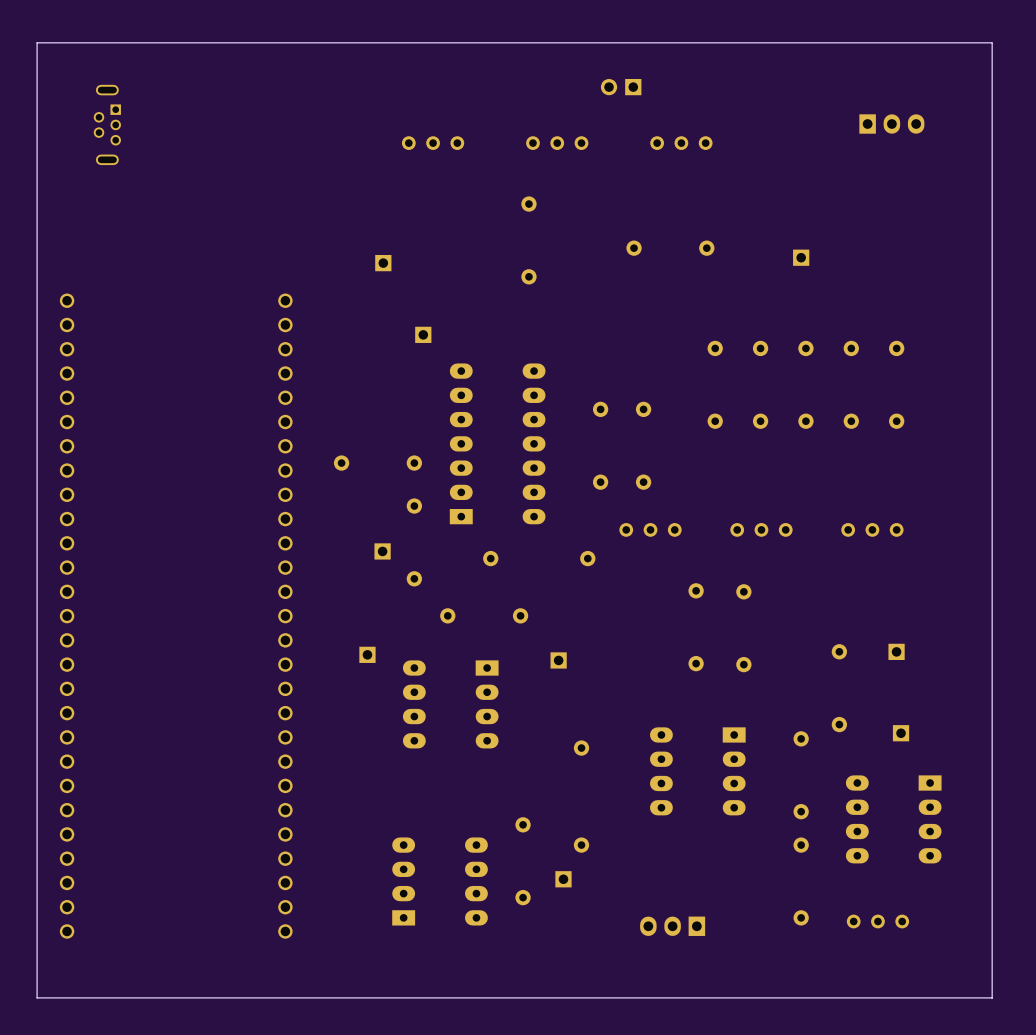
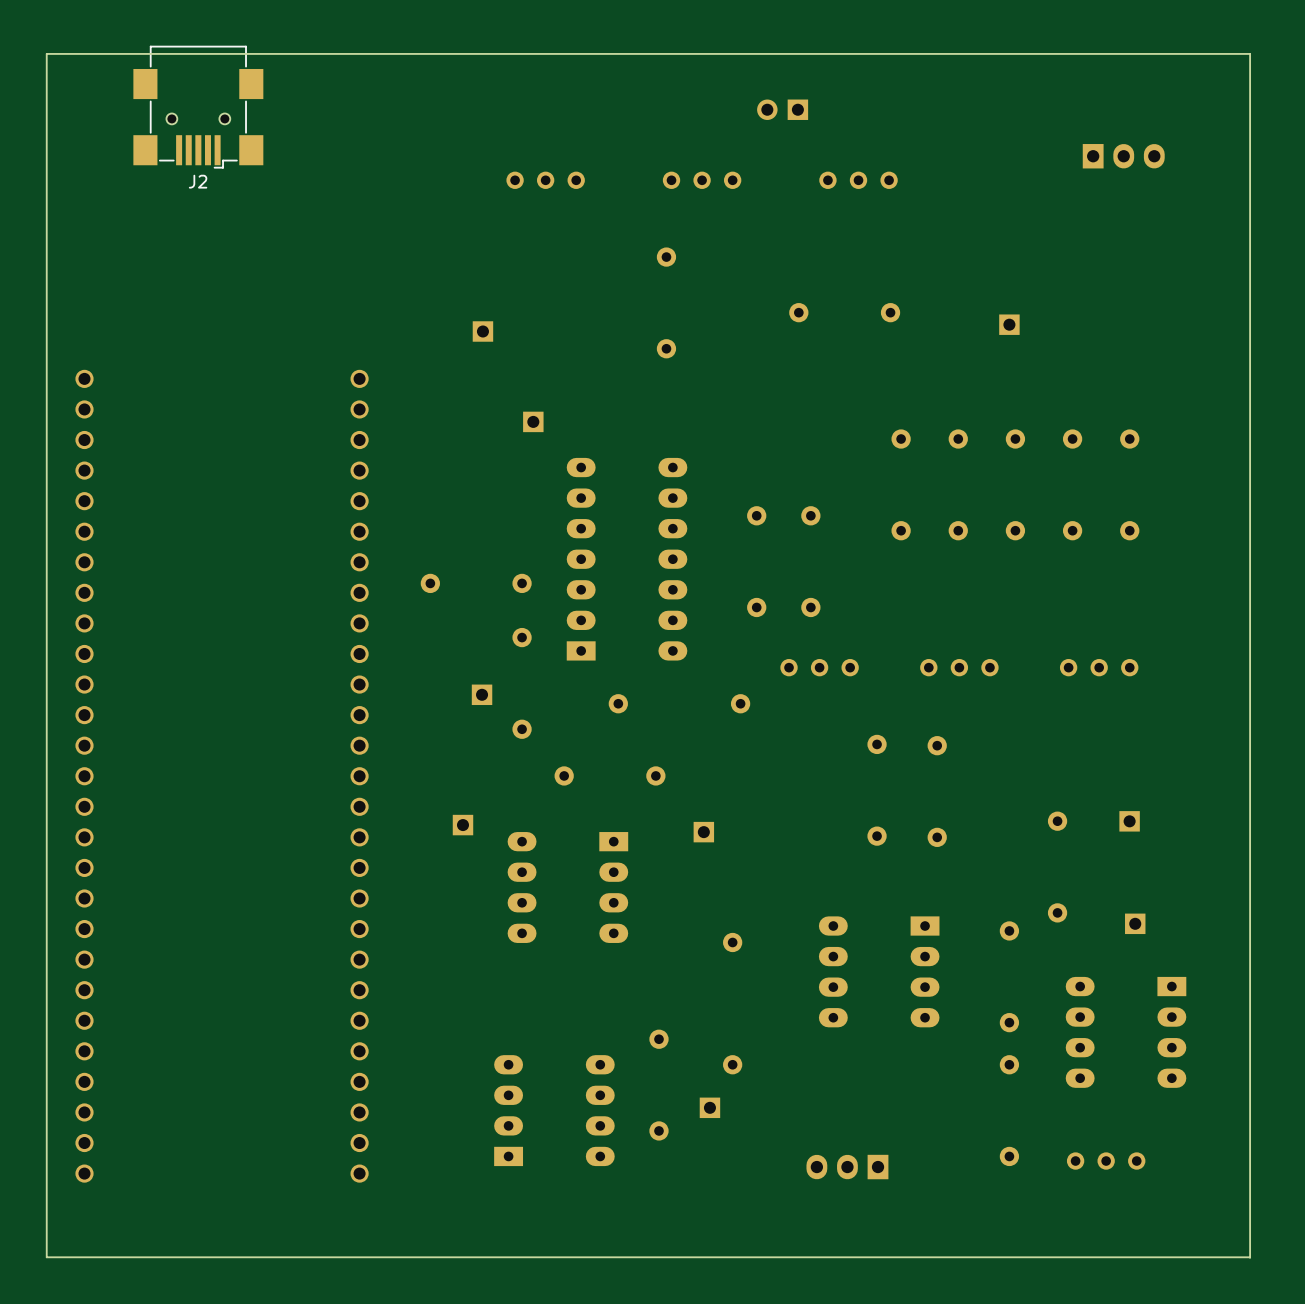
J2: none -> (198, 107)
part: (107, 124) -> none

